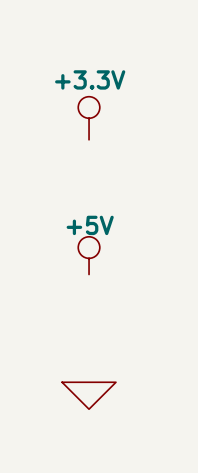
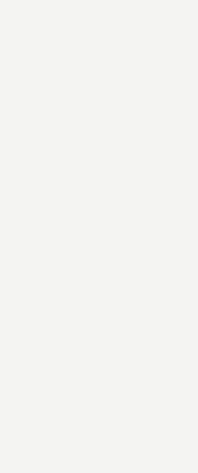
power symbol: +3.3V (89, 118) -> none
power symbol: +5V (89, 255) -> none
power symbol: (89, 395) -> none

